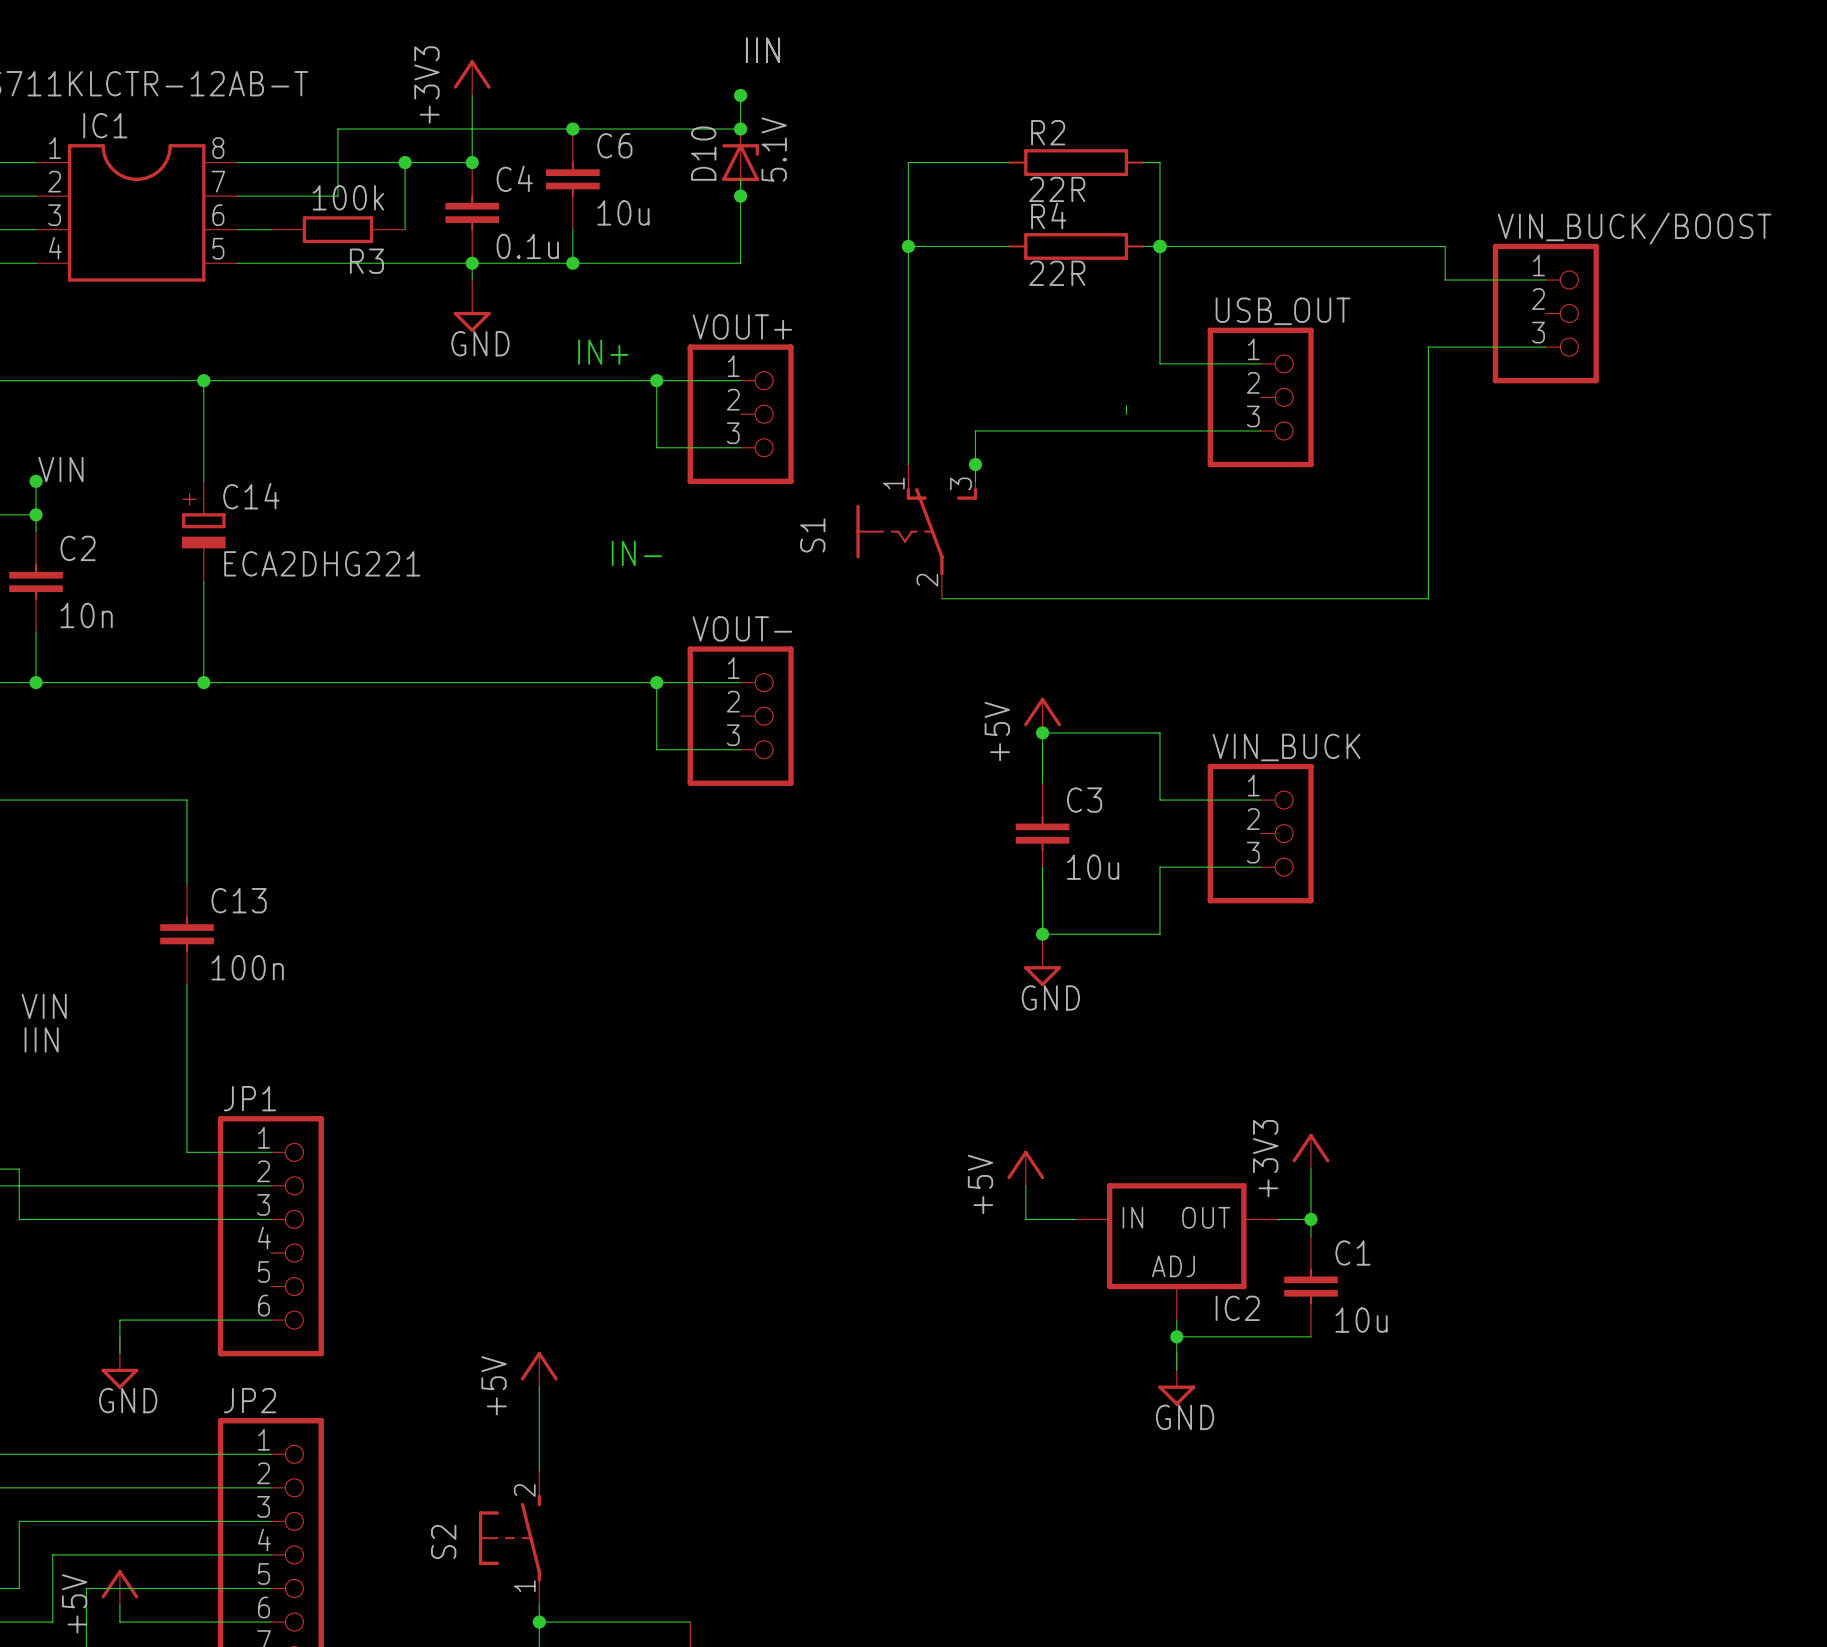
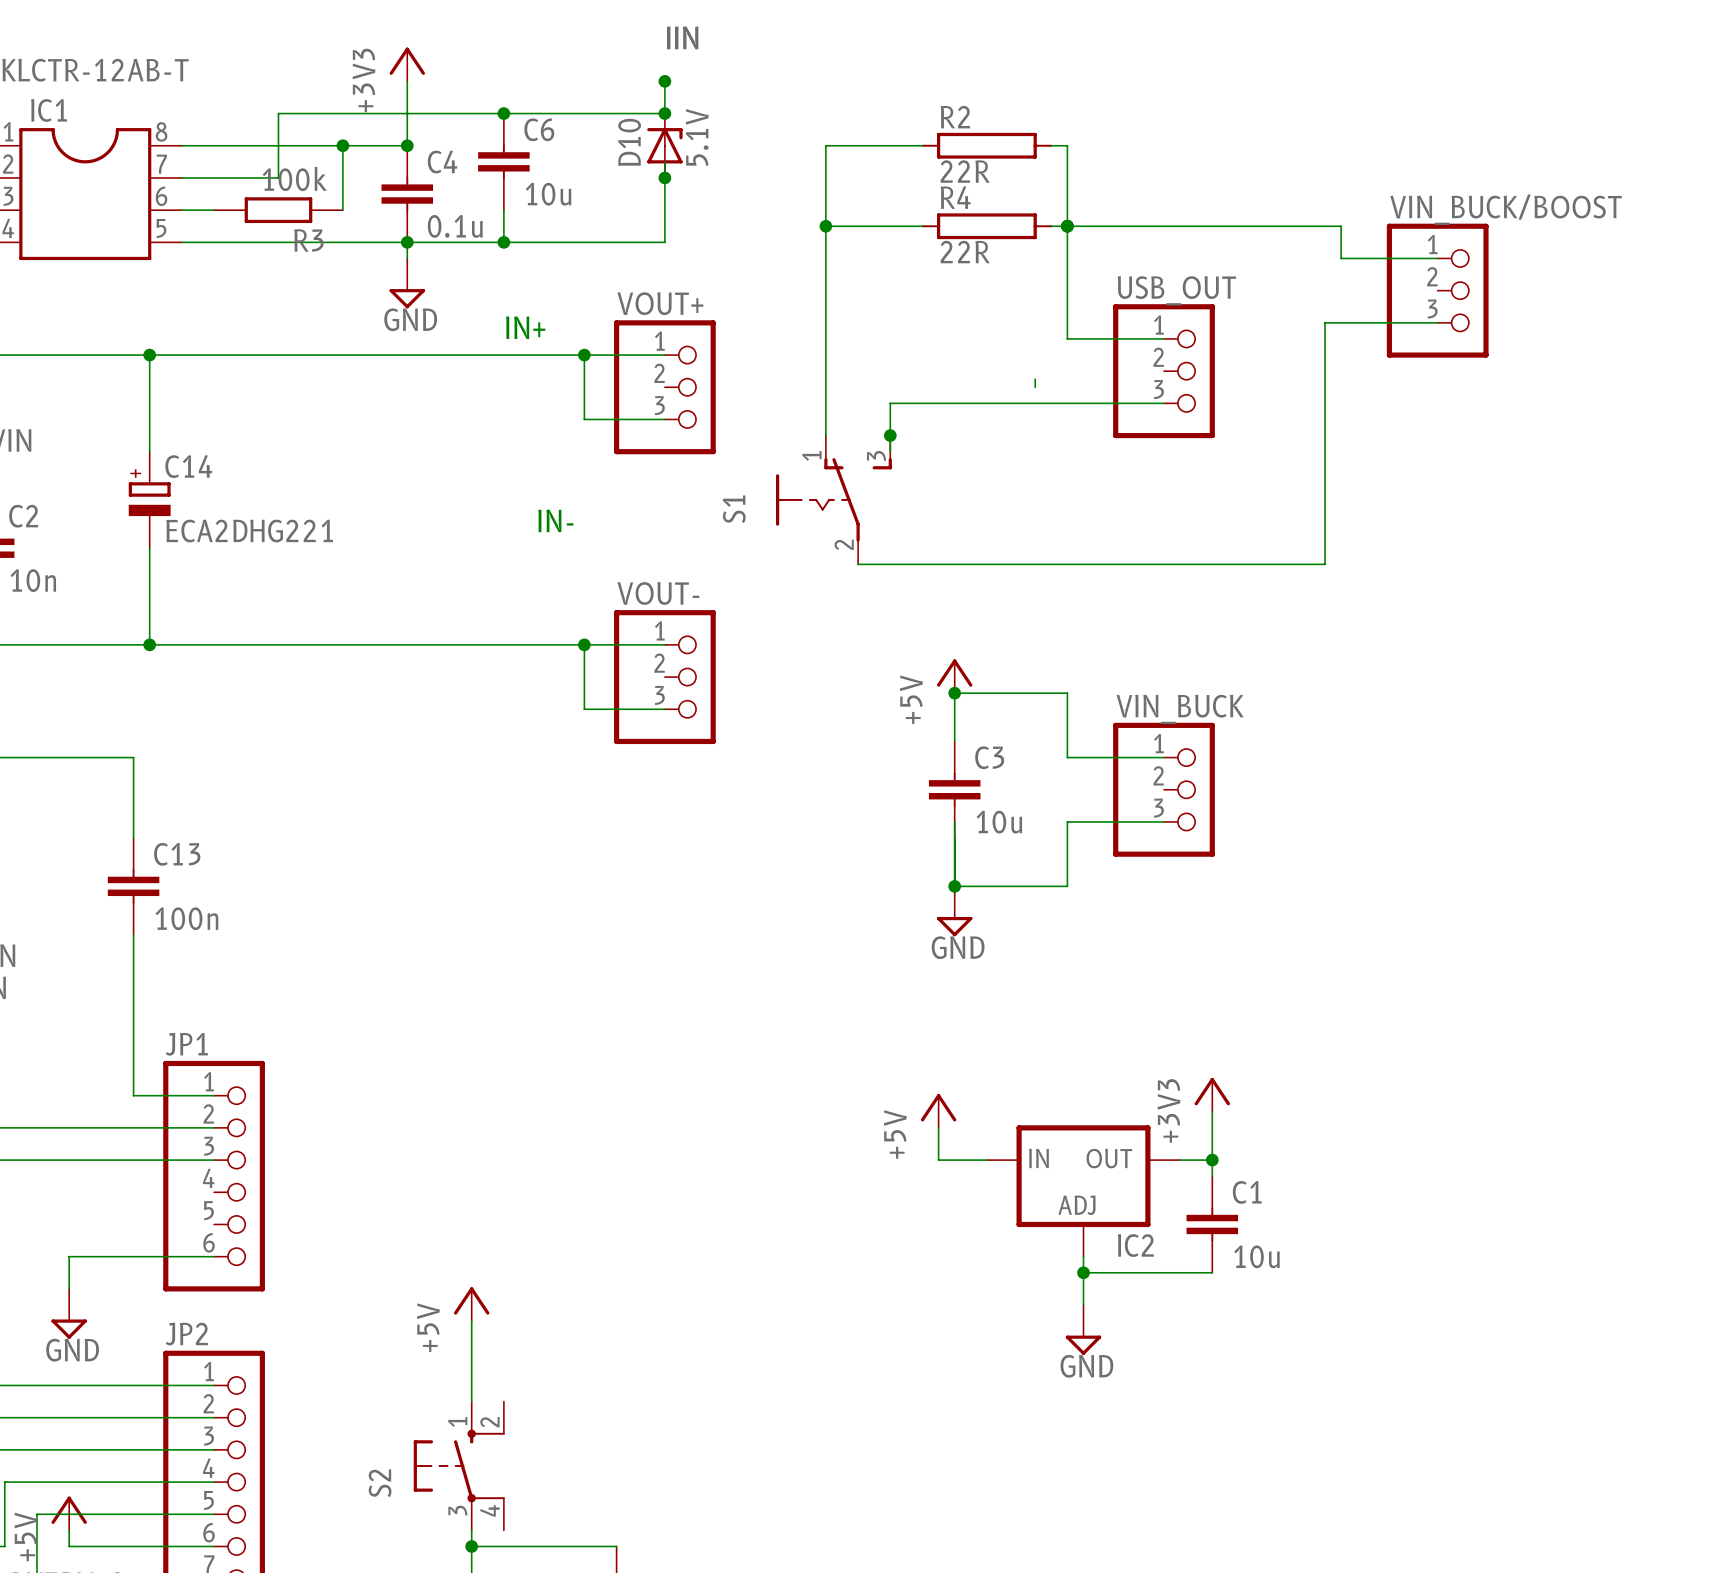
power symbol position: GND (119, 1362) -> GND (69, 1313)
power symbol position: GND (1176, 1379) -> GND (1083, 1329)
S2 symbol: [478, 1471, 541, 1606] -> [413, 1401, 505, 1531]

